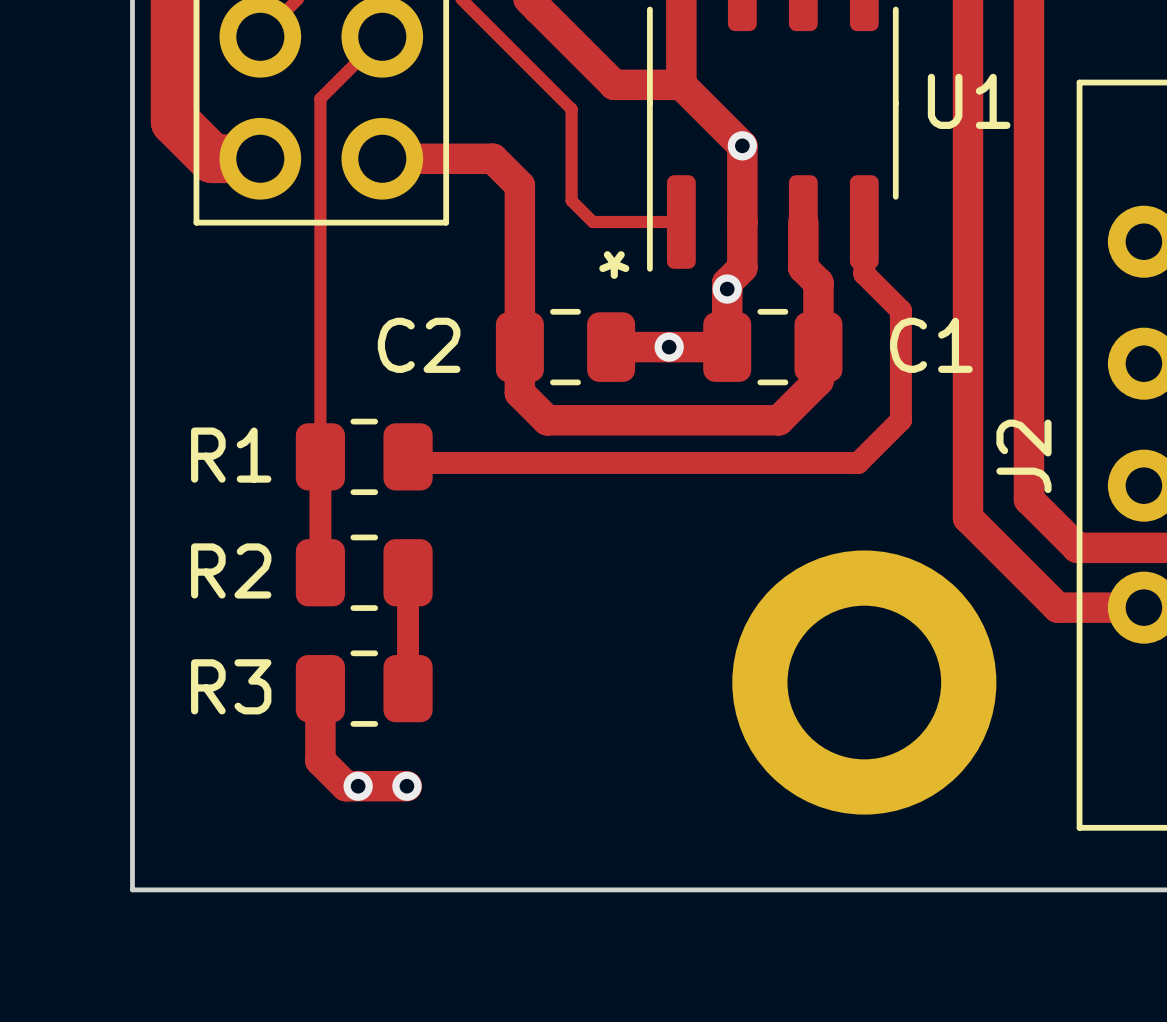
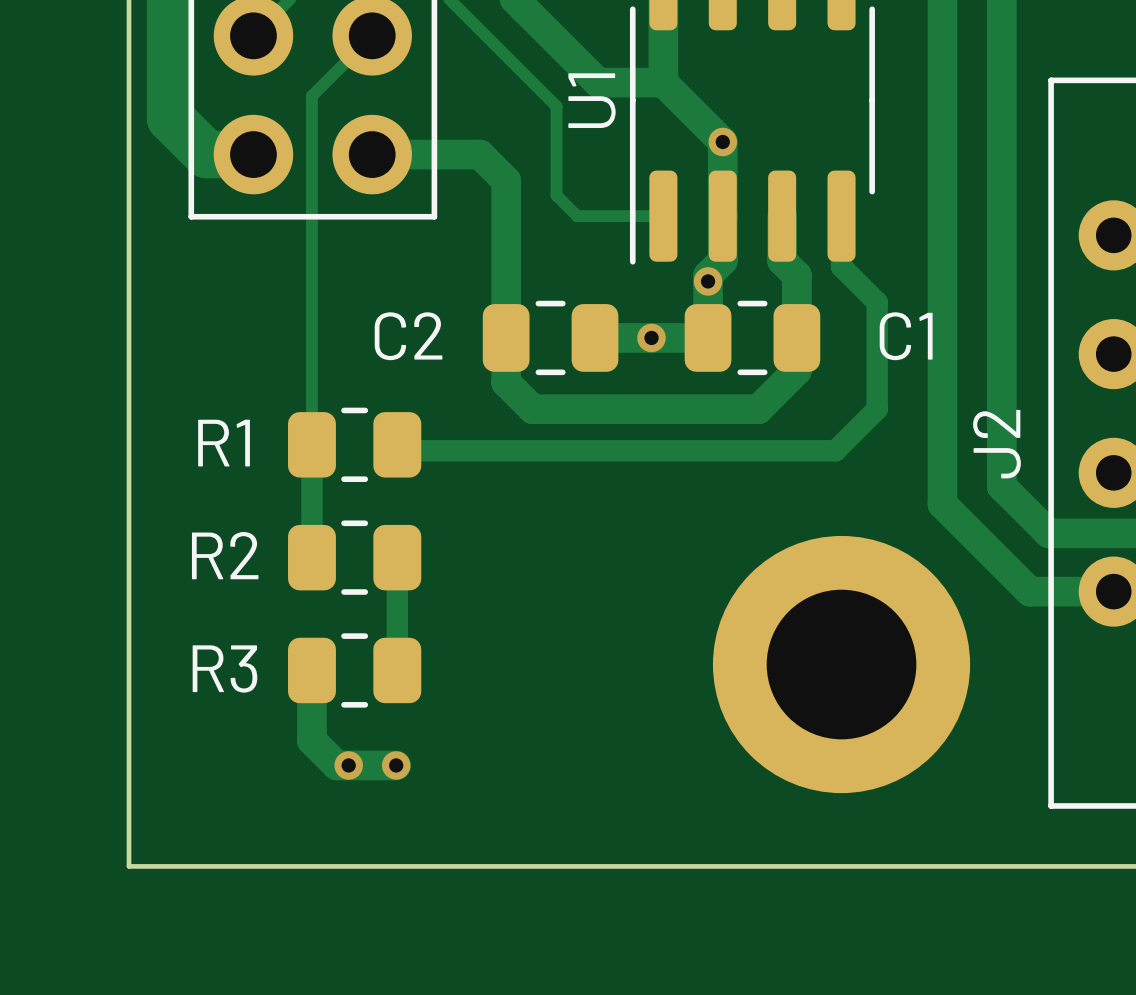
U1 name rotation: 0° (969, 101) -> 90° counterclockwise (592, 100)
U1 name position: U1 (969, 101) -> U1 (592, 100)
text: * (614, 265) -> none

